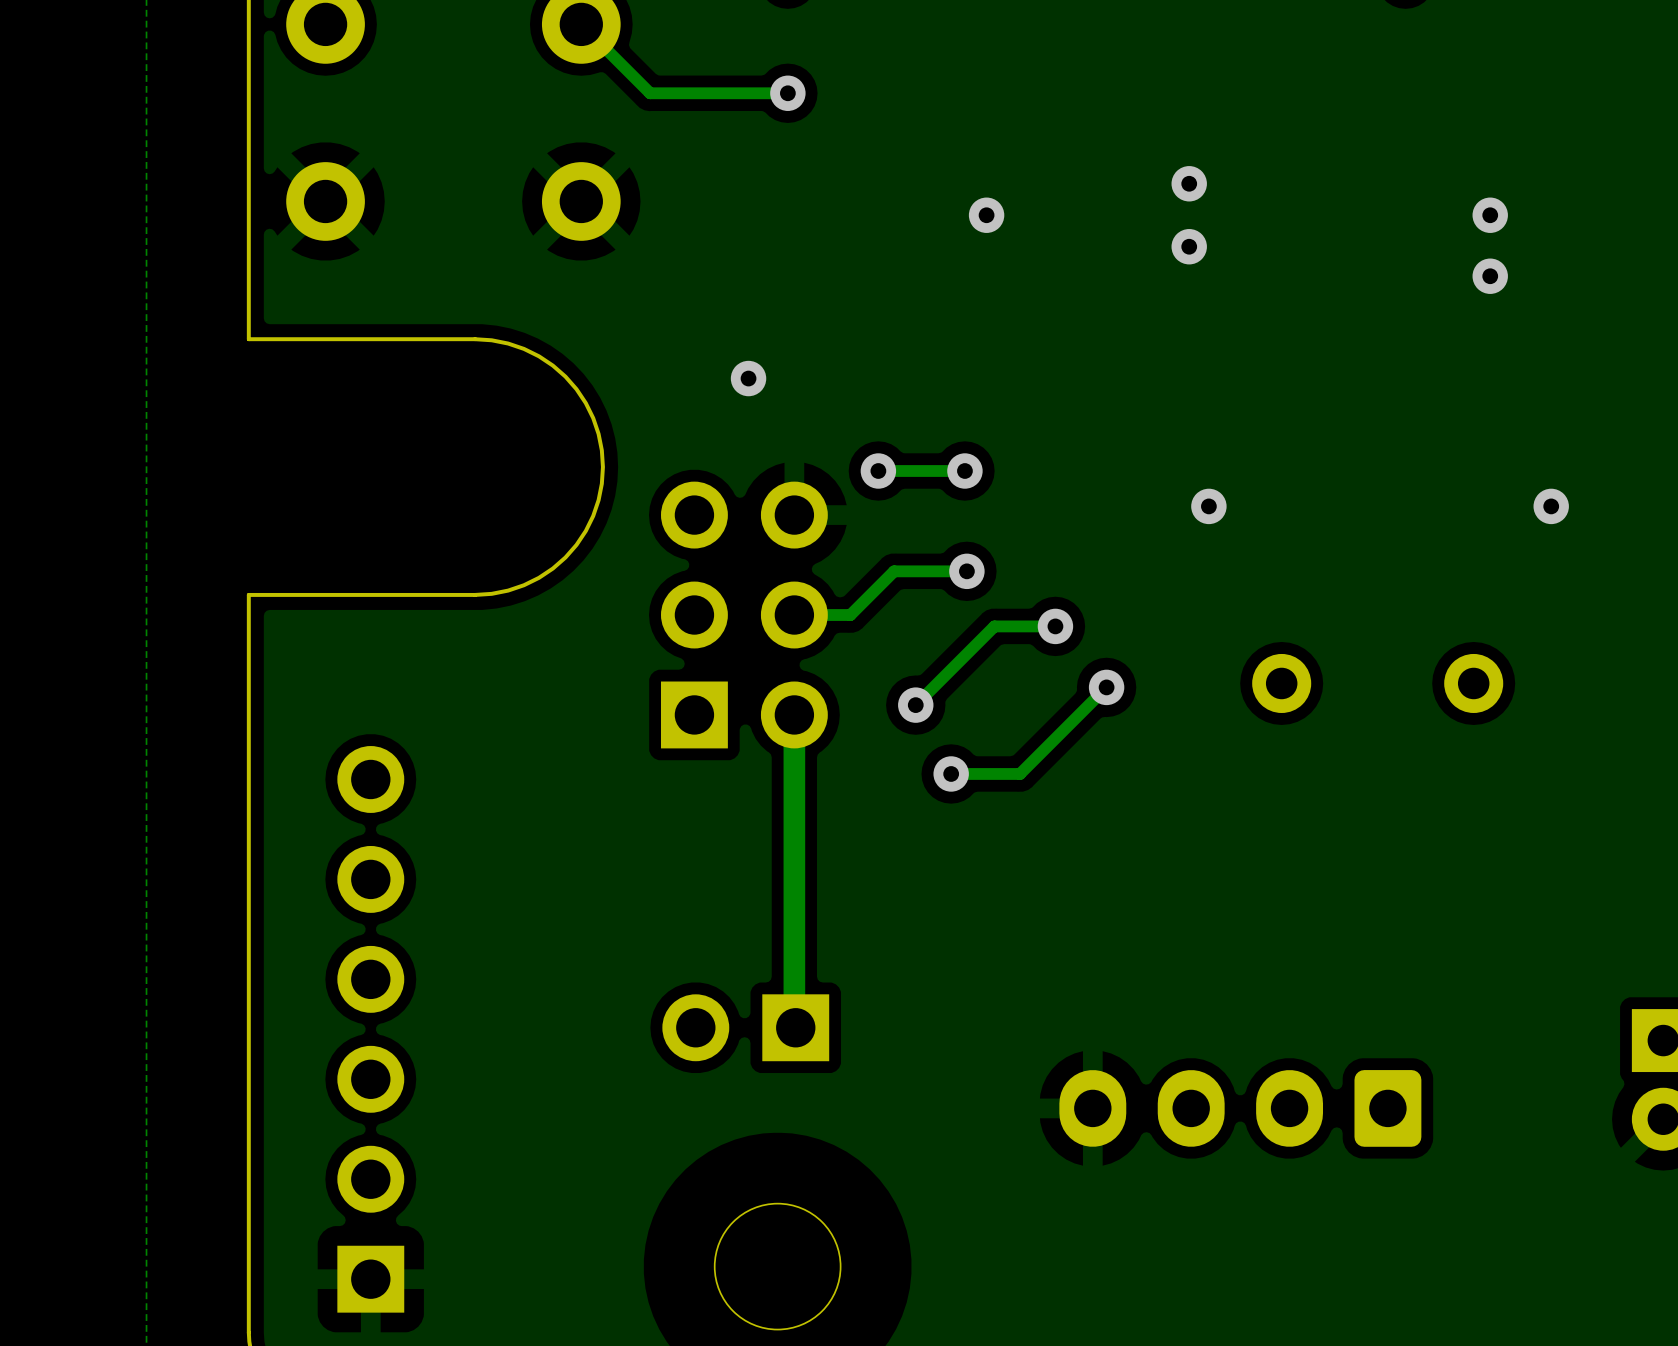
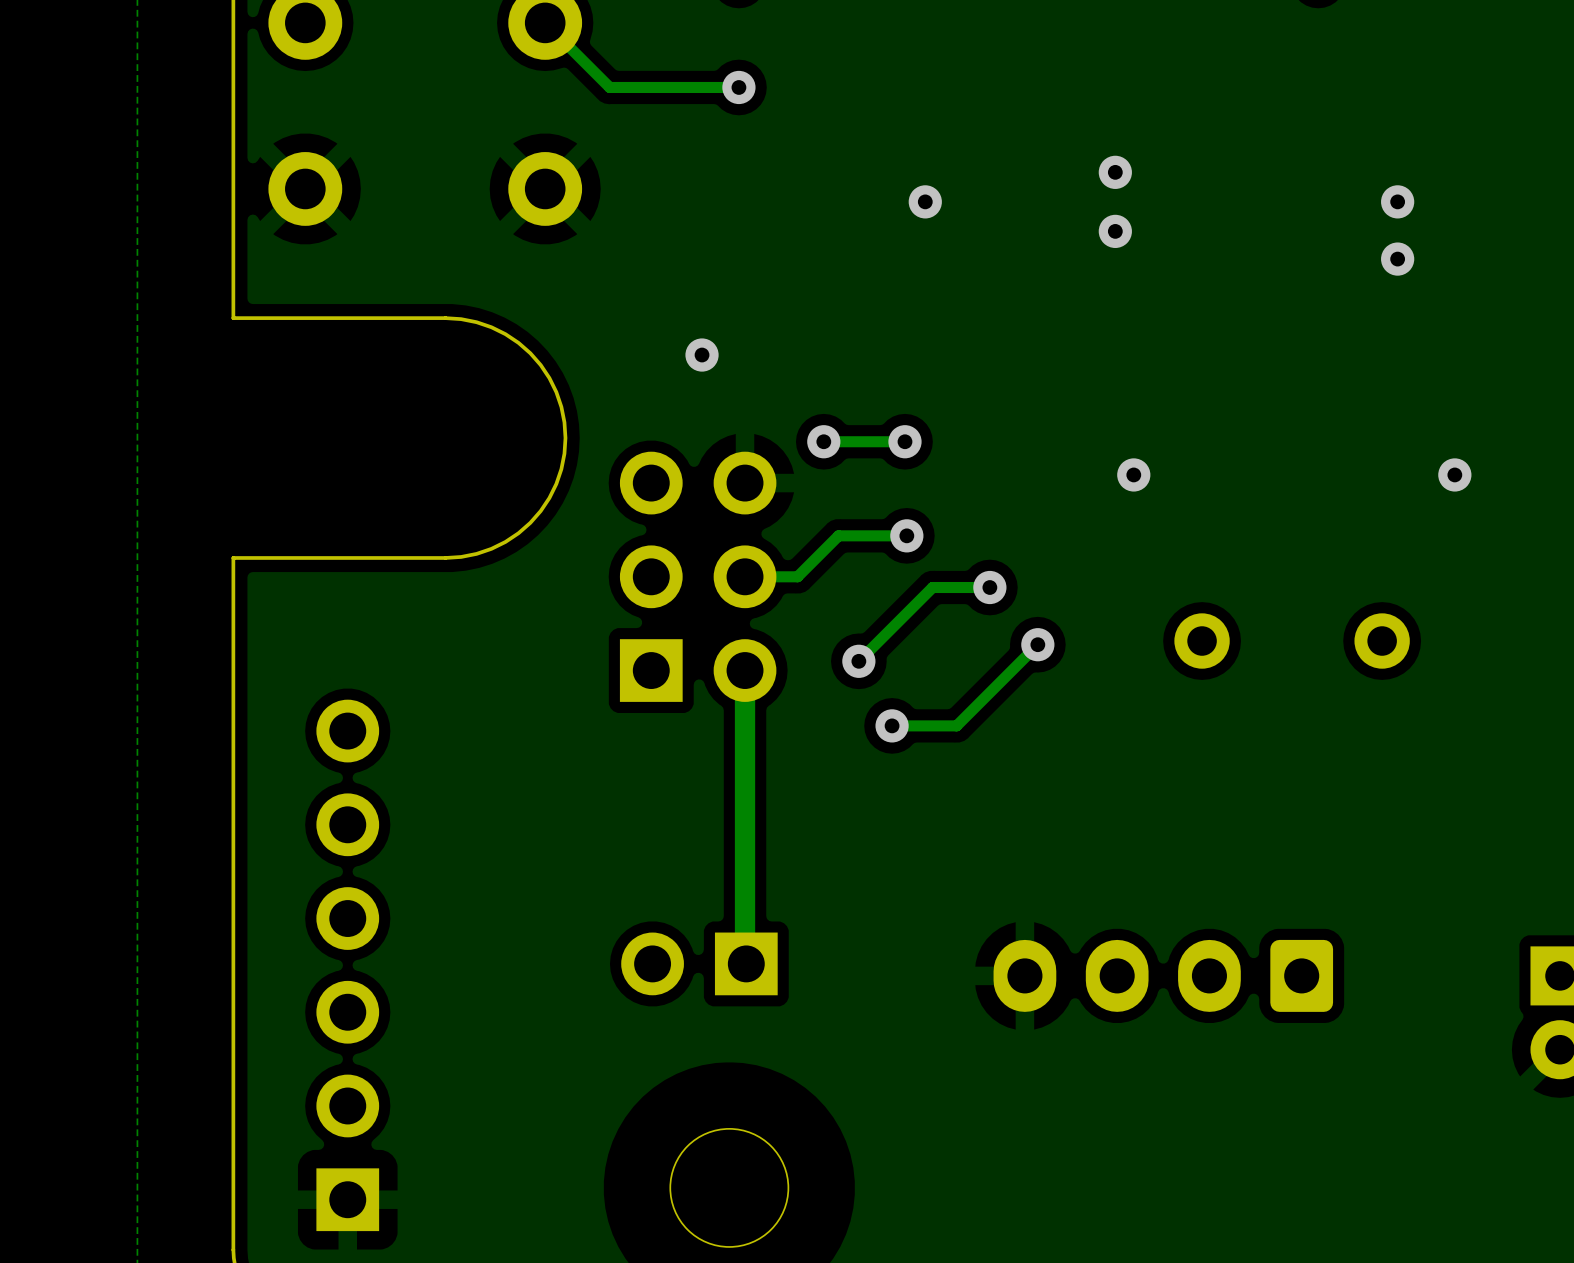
part position: (1240, 1108) -> (1163, 975)

